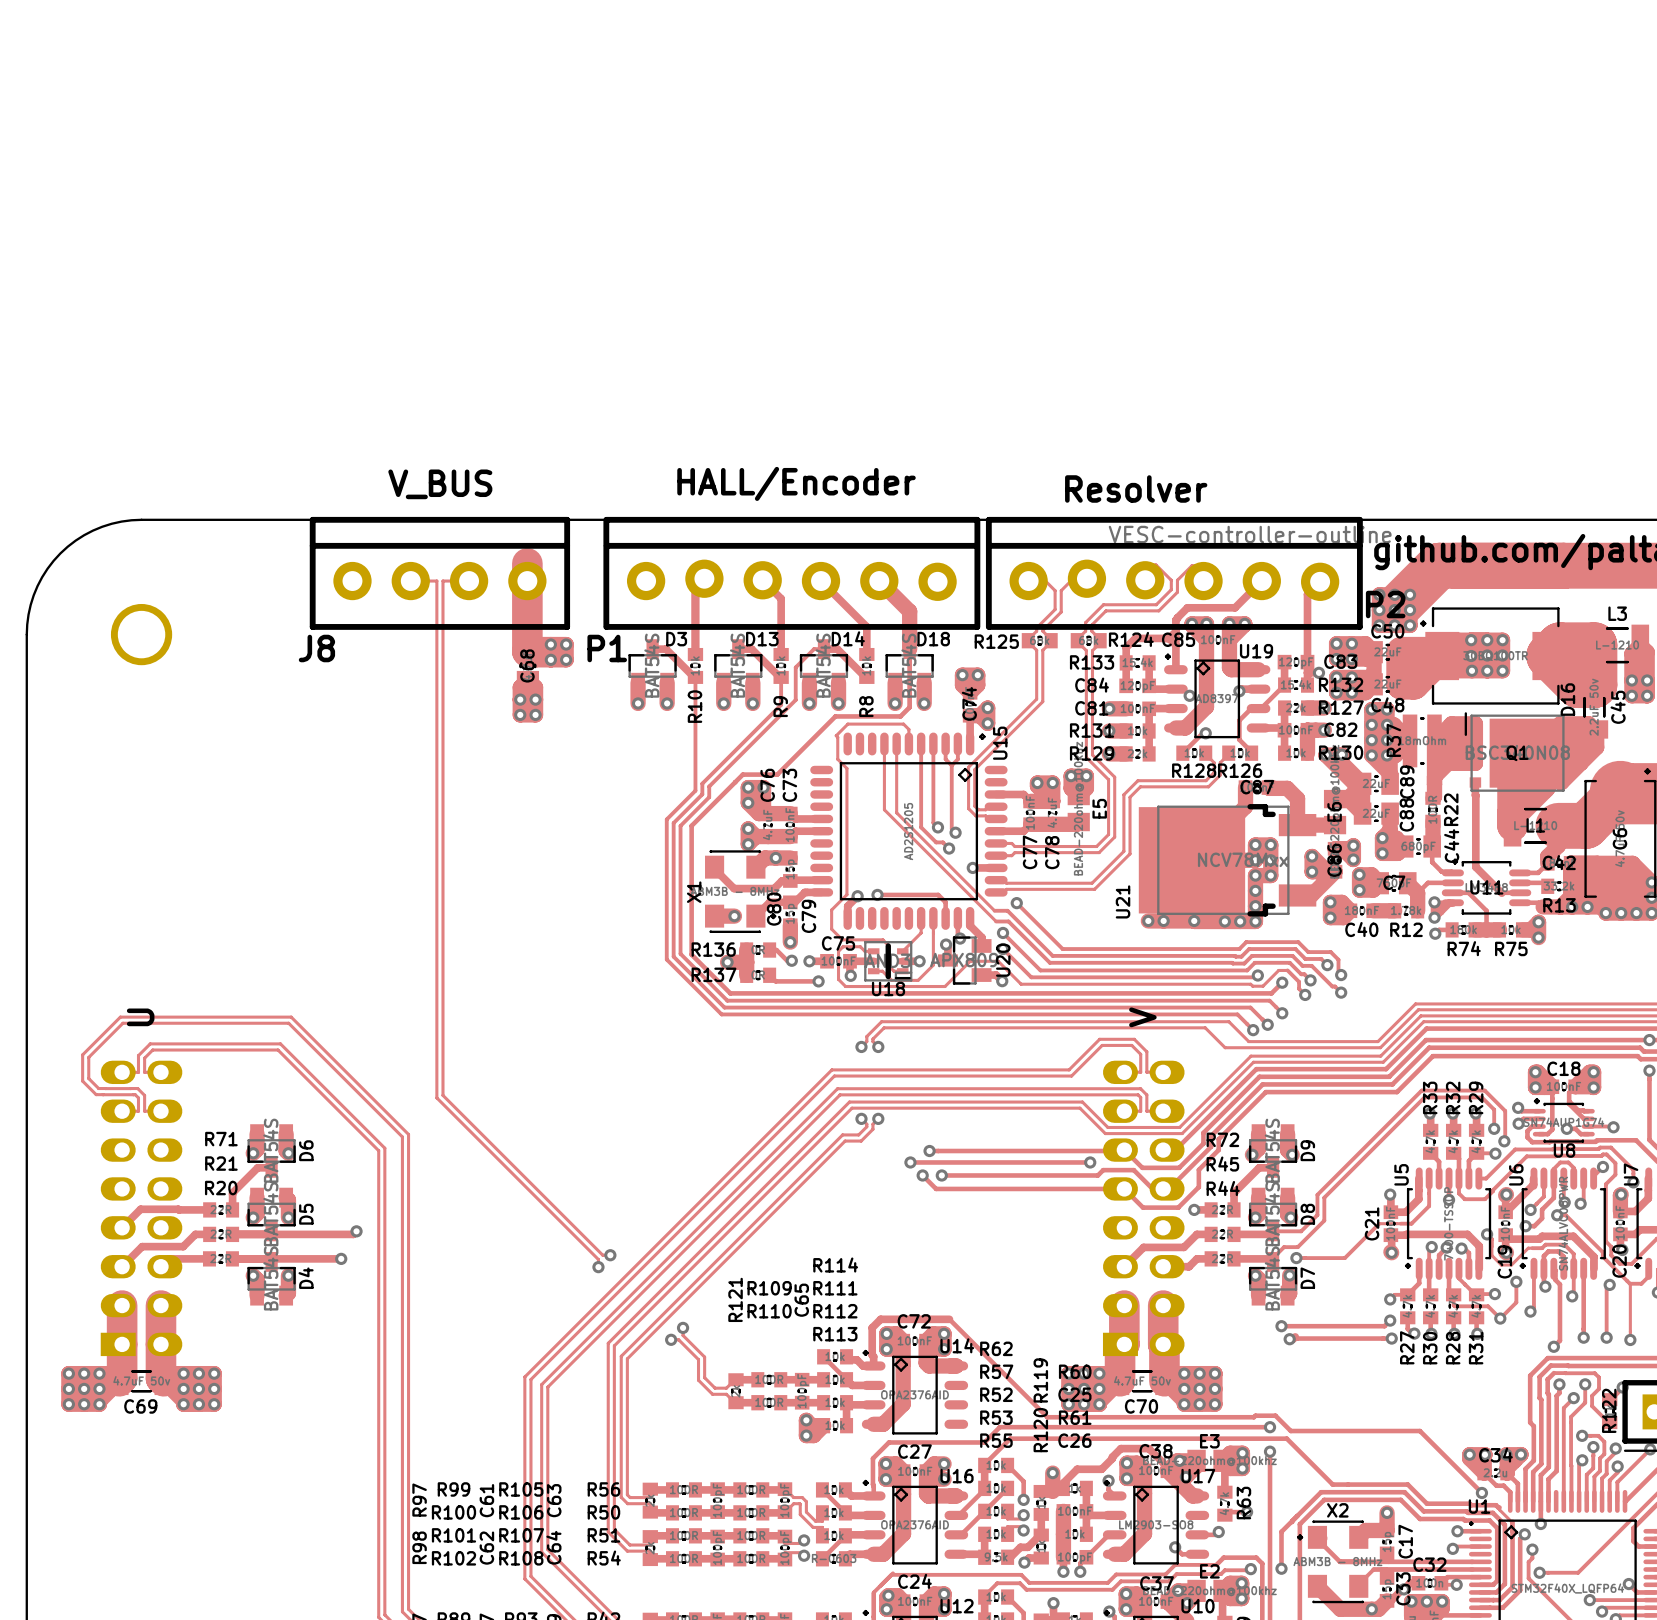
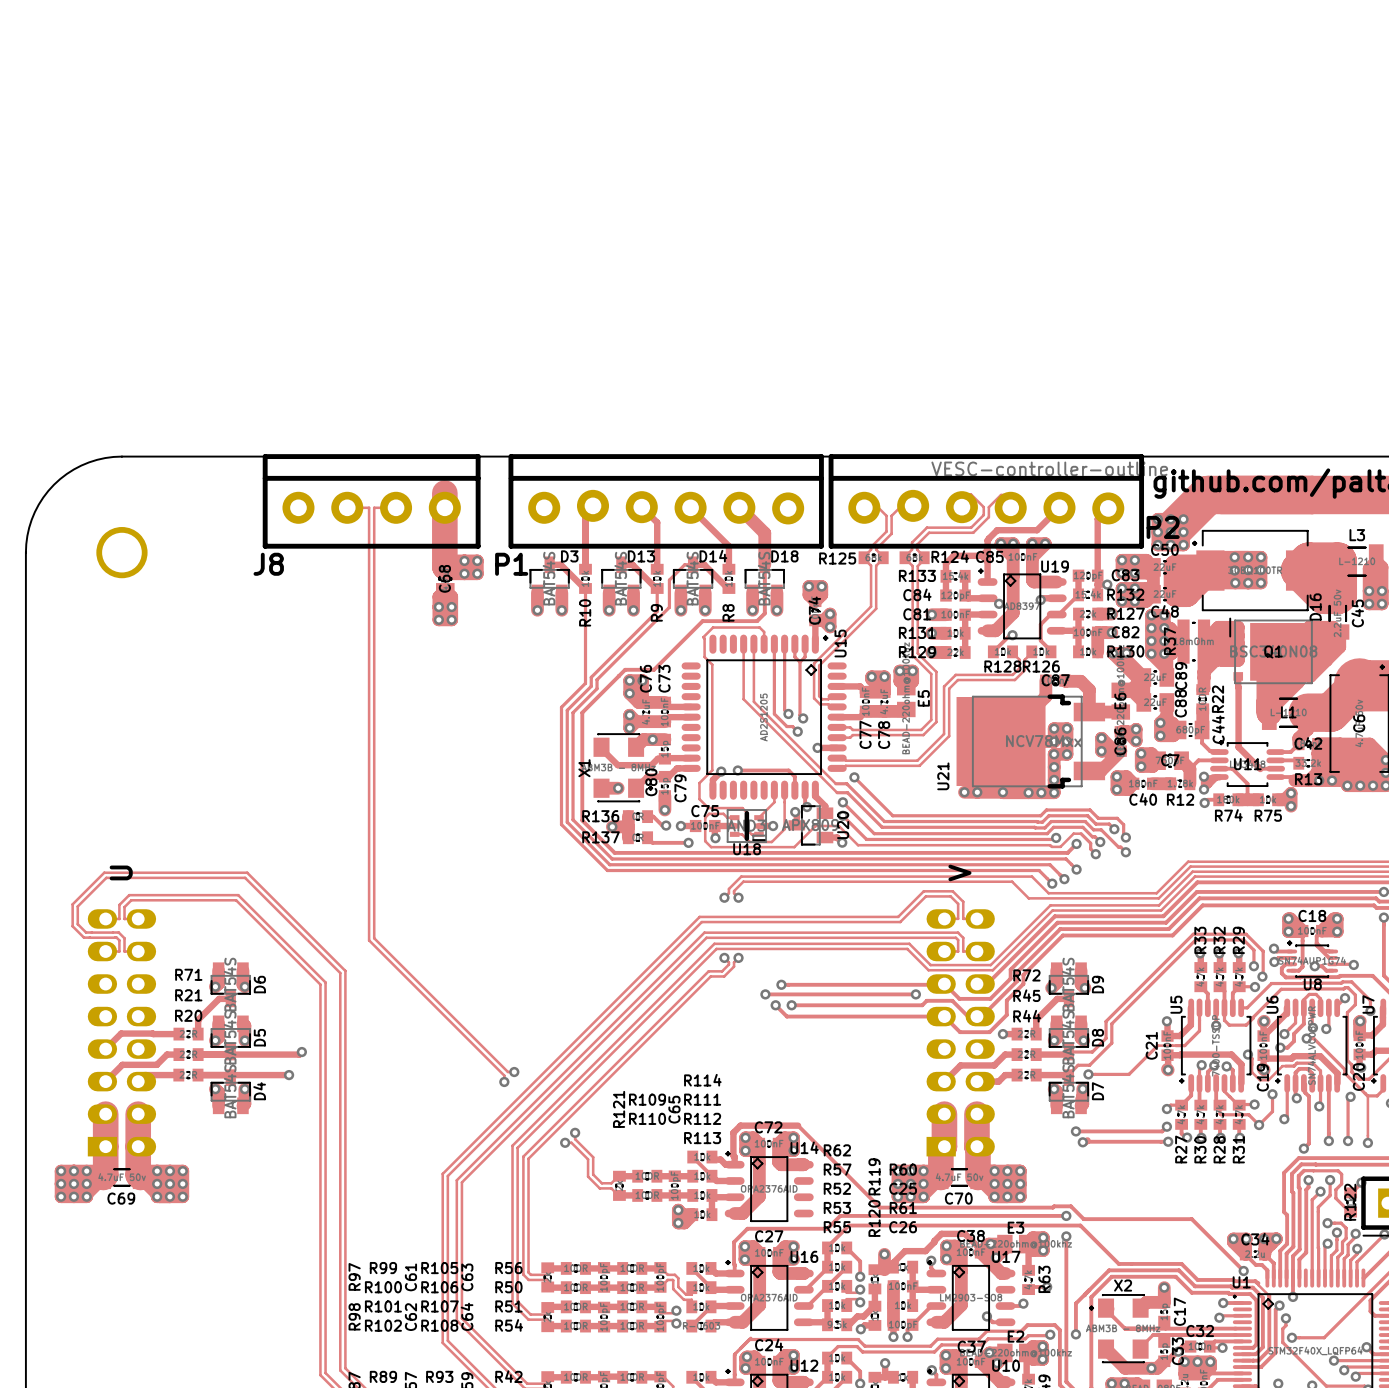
P1 value: HALL/Encoder (796, 483) -> none
J8 value: V_BUS (440, 484) -> none
P2 value: Resolver (1136, 488) -> none

